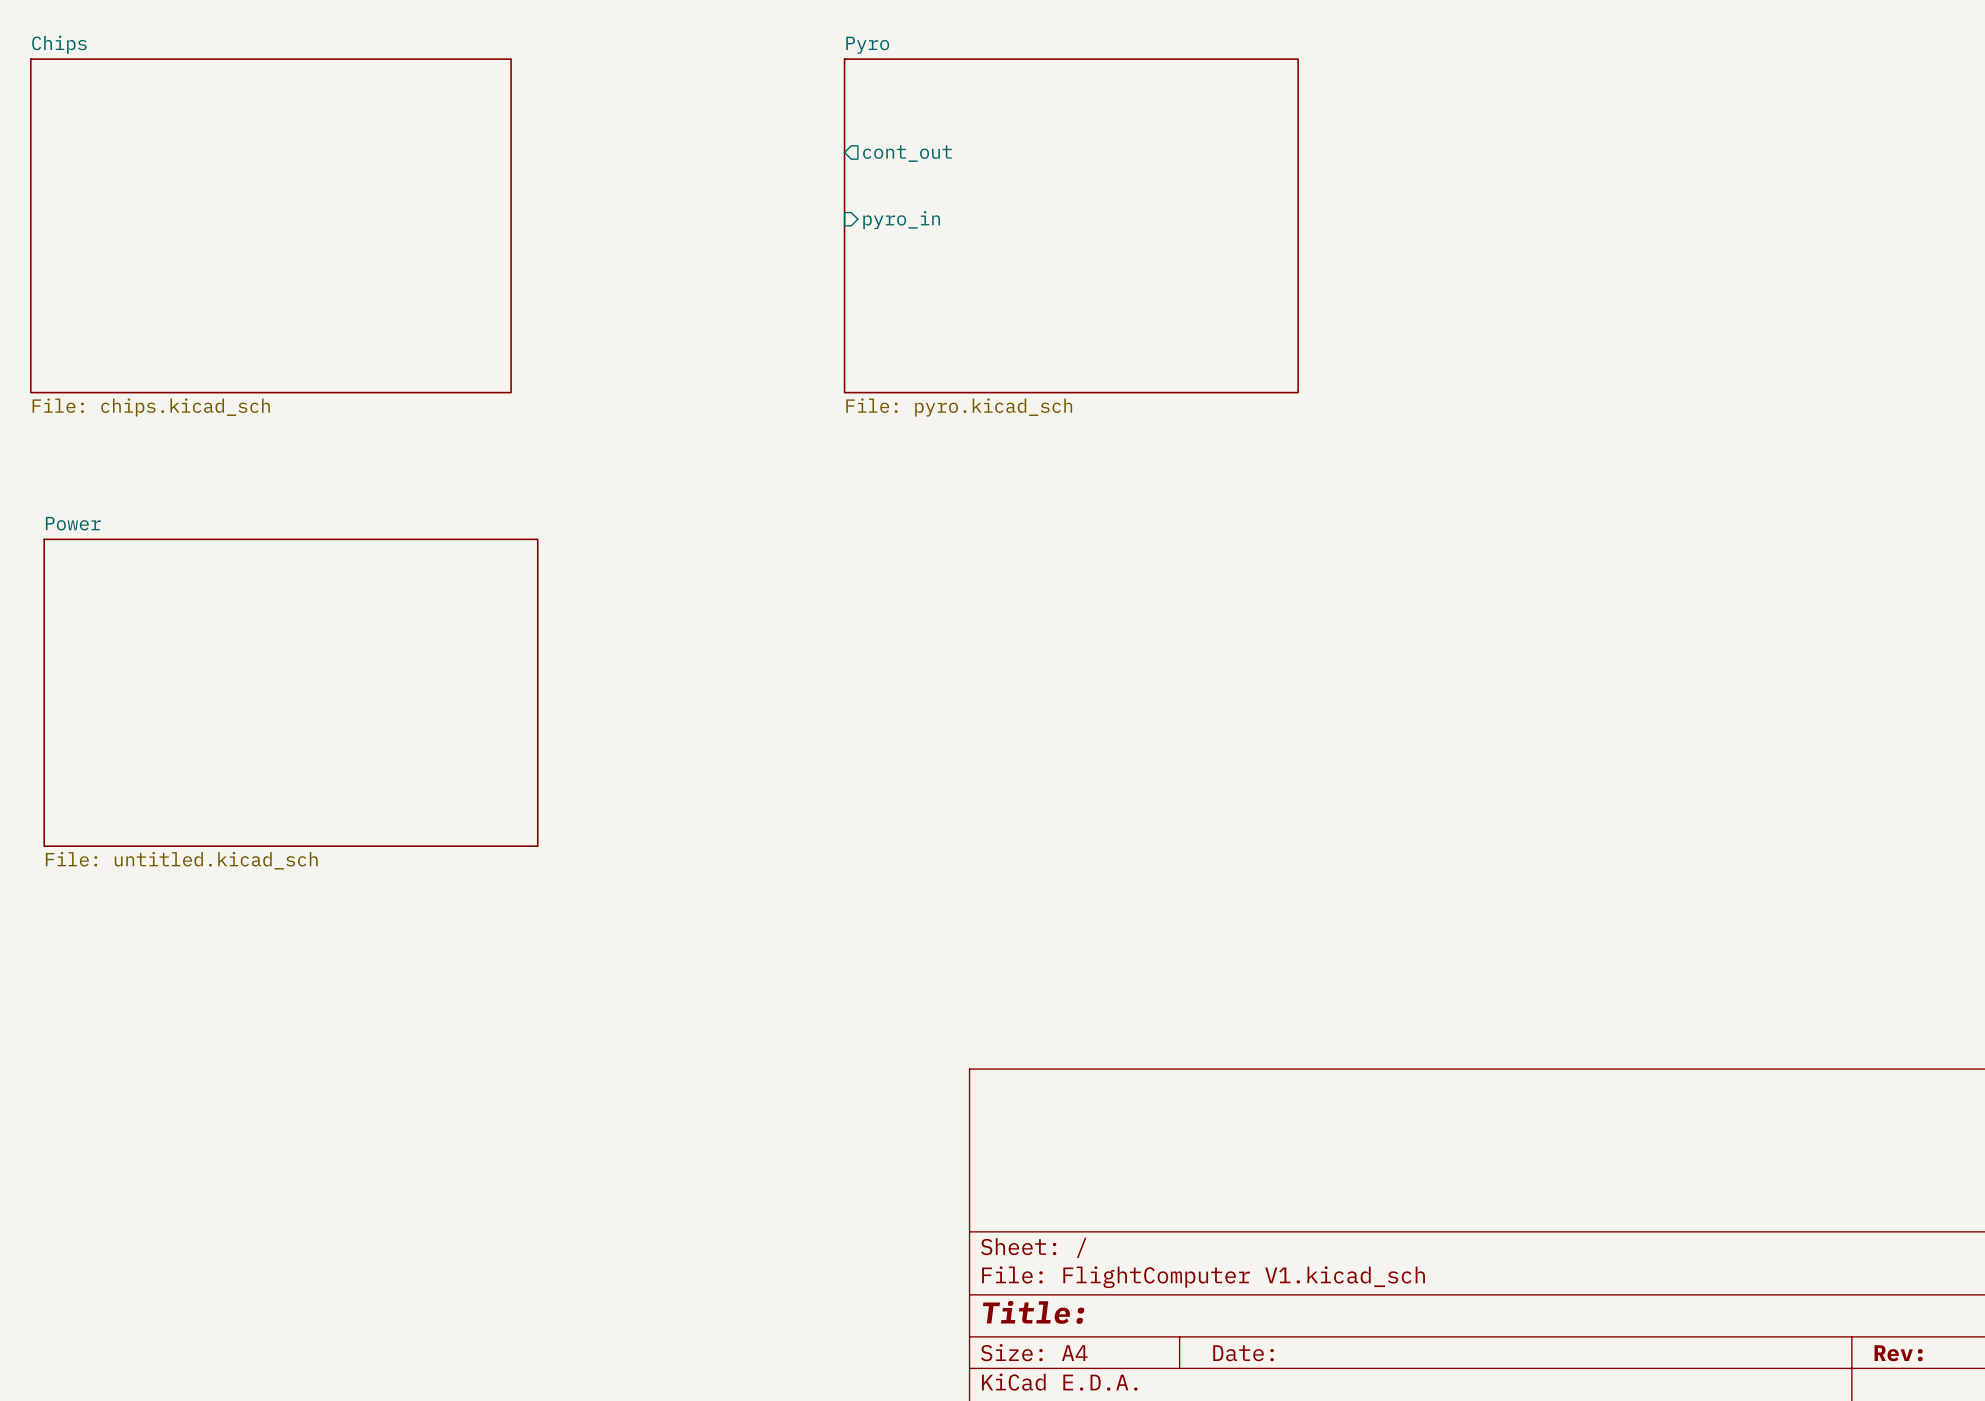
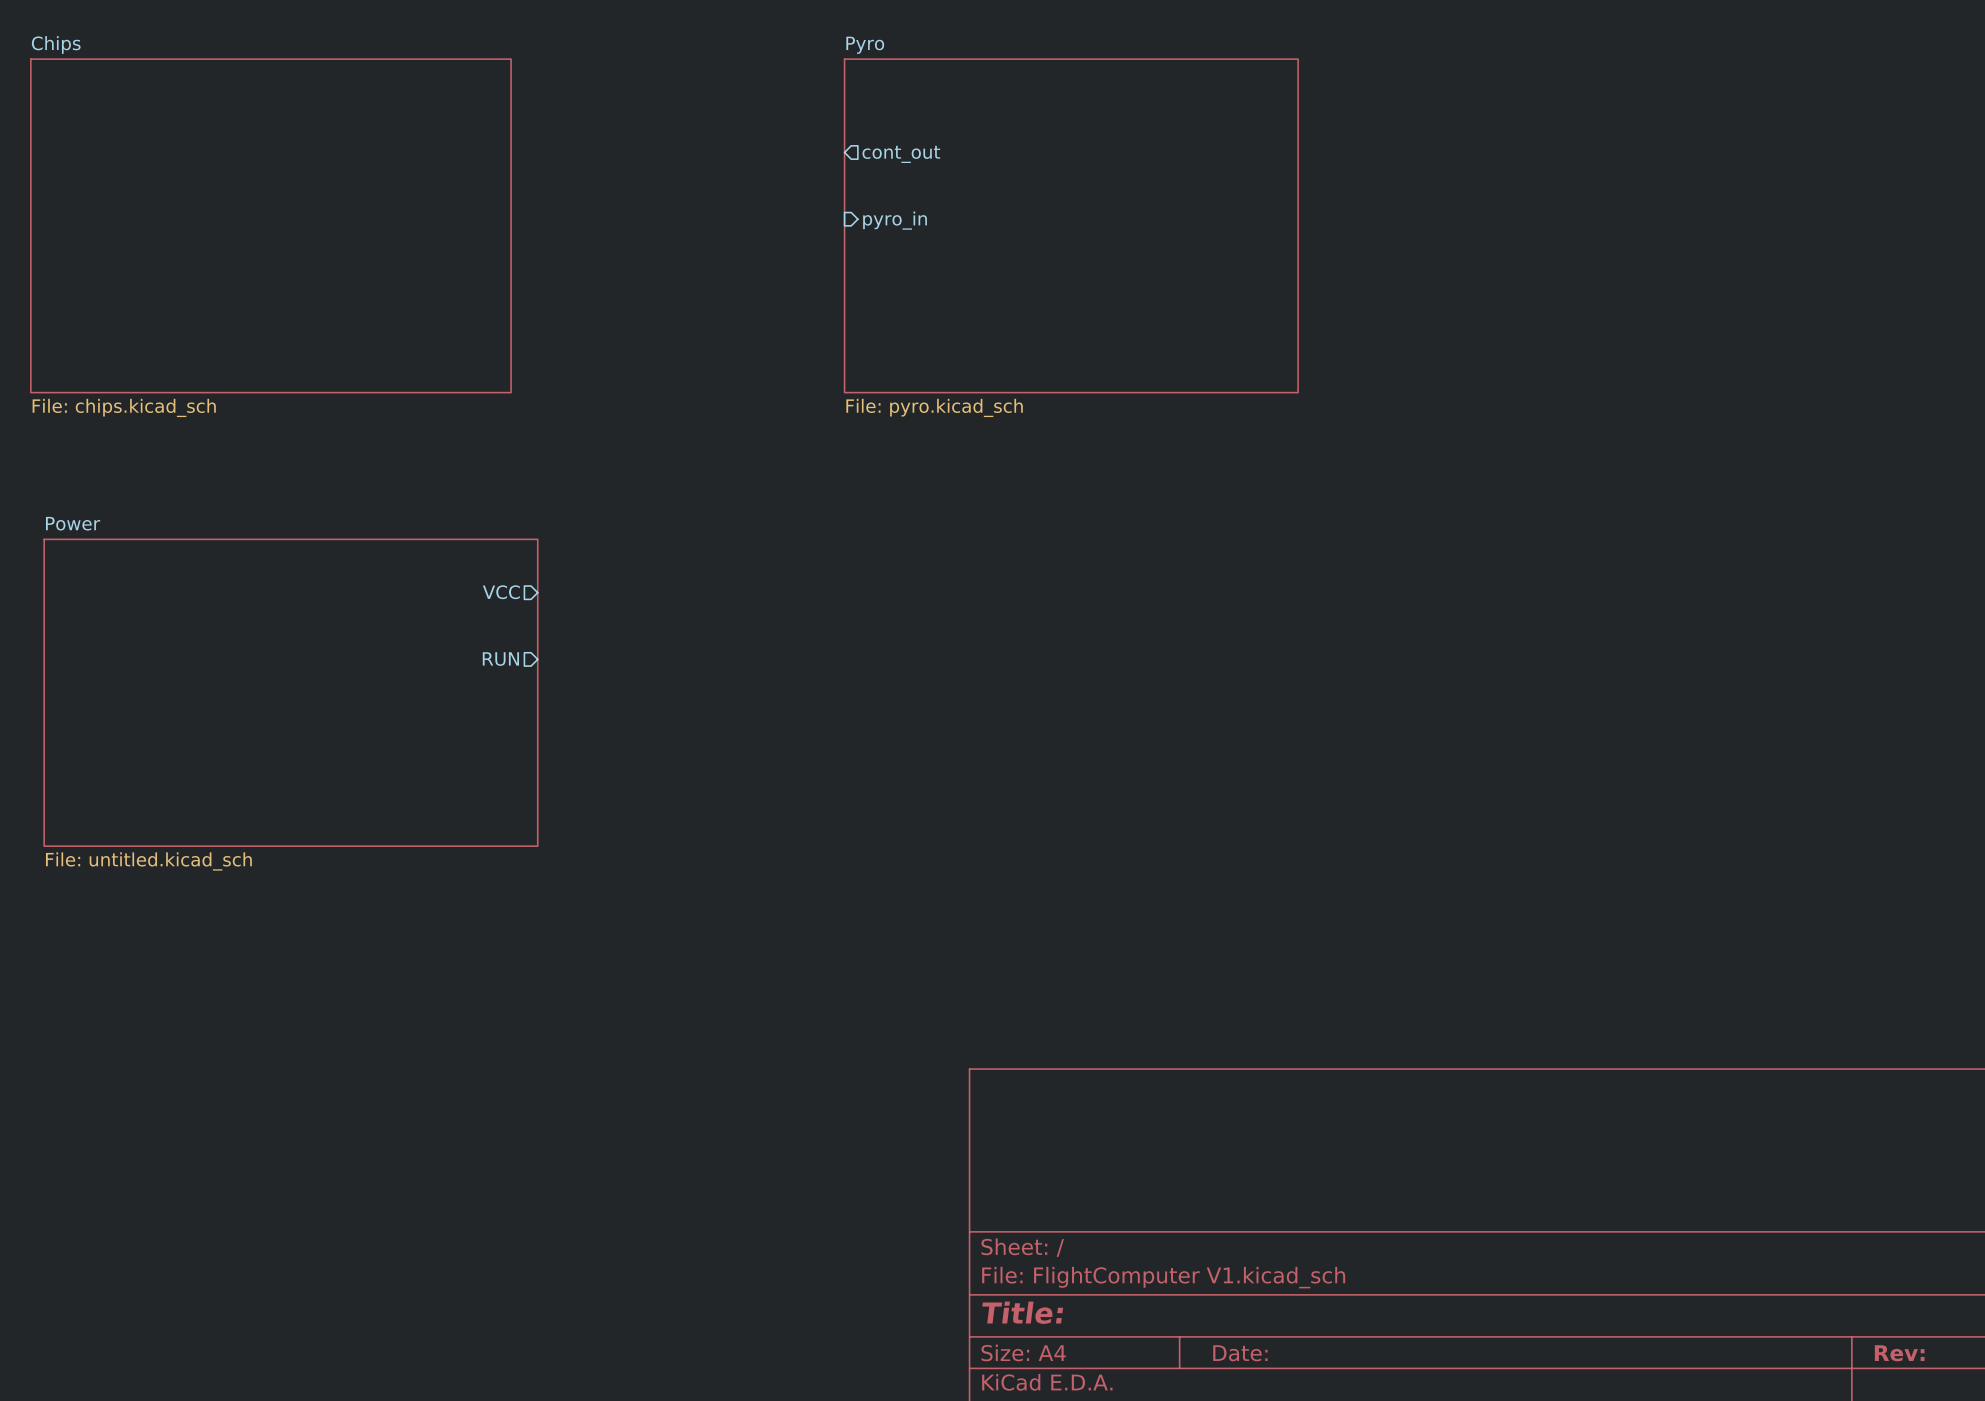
sheet pin: none -> VCC (501, 592)
sheet pin: none -> RUN (500, 659)

